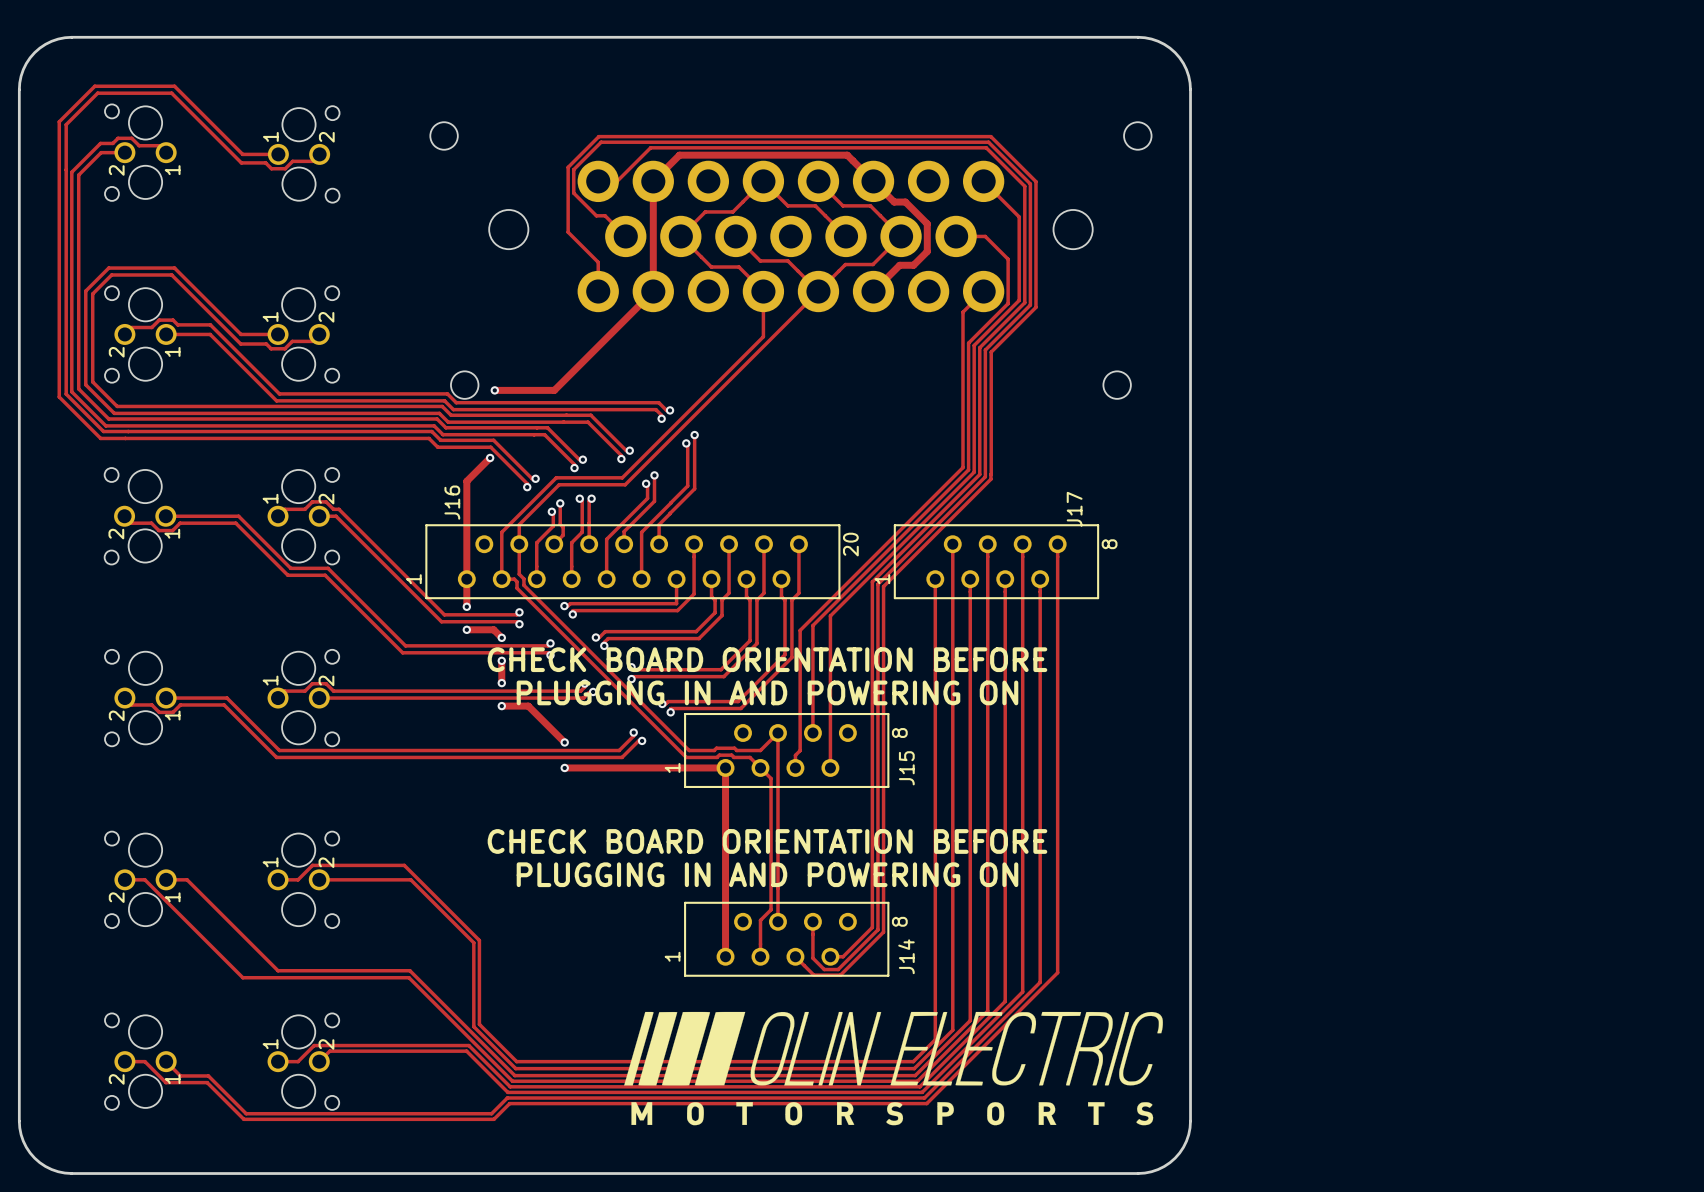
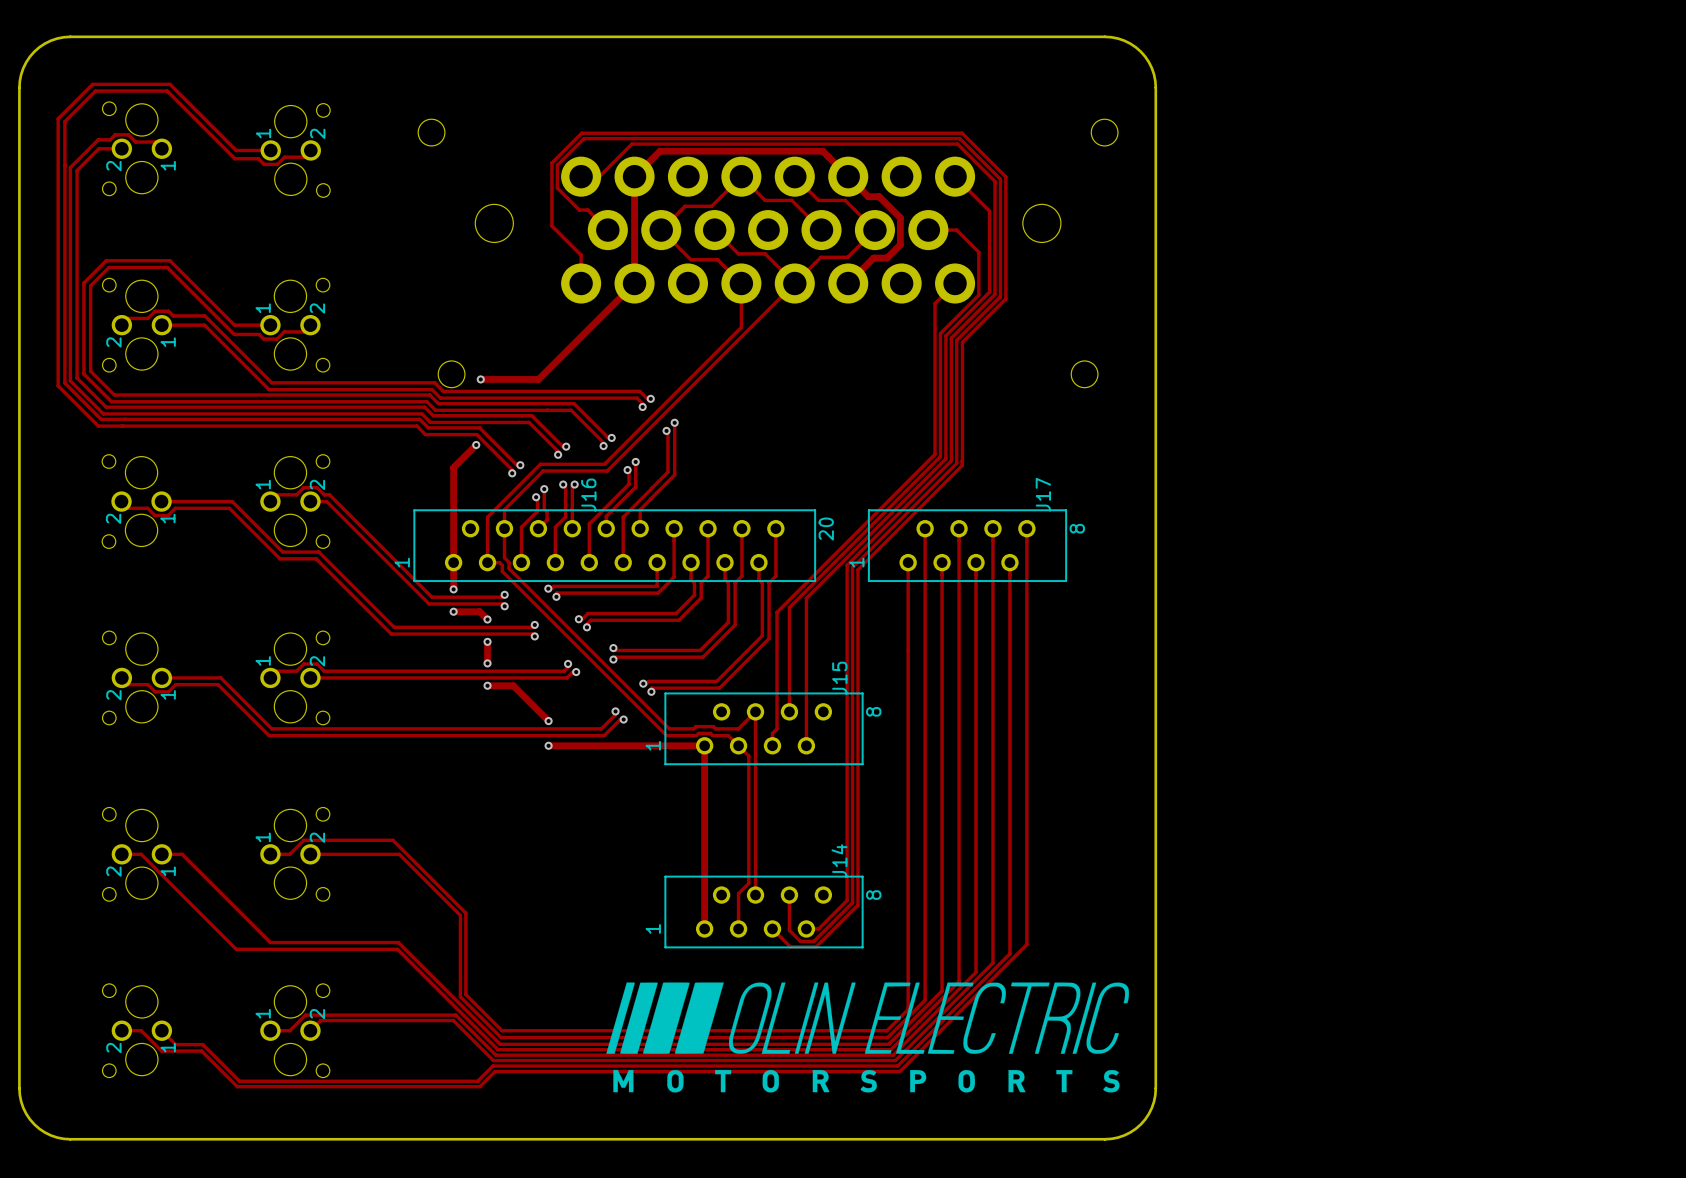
J16 name position: J16 (452, 502) -> J16 (588, 495)
text: CHECK BOARD ORIENTATION BEFORE (767, 659) -> none
text: PLUGGING IN AND POWERING ON (767, 692) -> none
J15 name position: J15 (906, 768) -> J15 (839, 678)
text: CHECK BOARD ORIENTATION BEFORE (767, 841) -> none
text: PLUGGING IN AND POWERING ON (767, 874) -> none
J14 name position: J14 (906, 956) -> J14 (839, 861)

